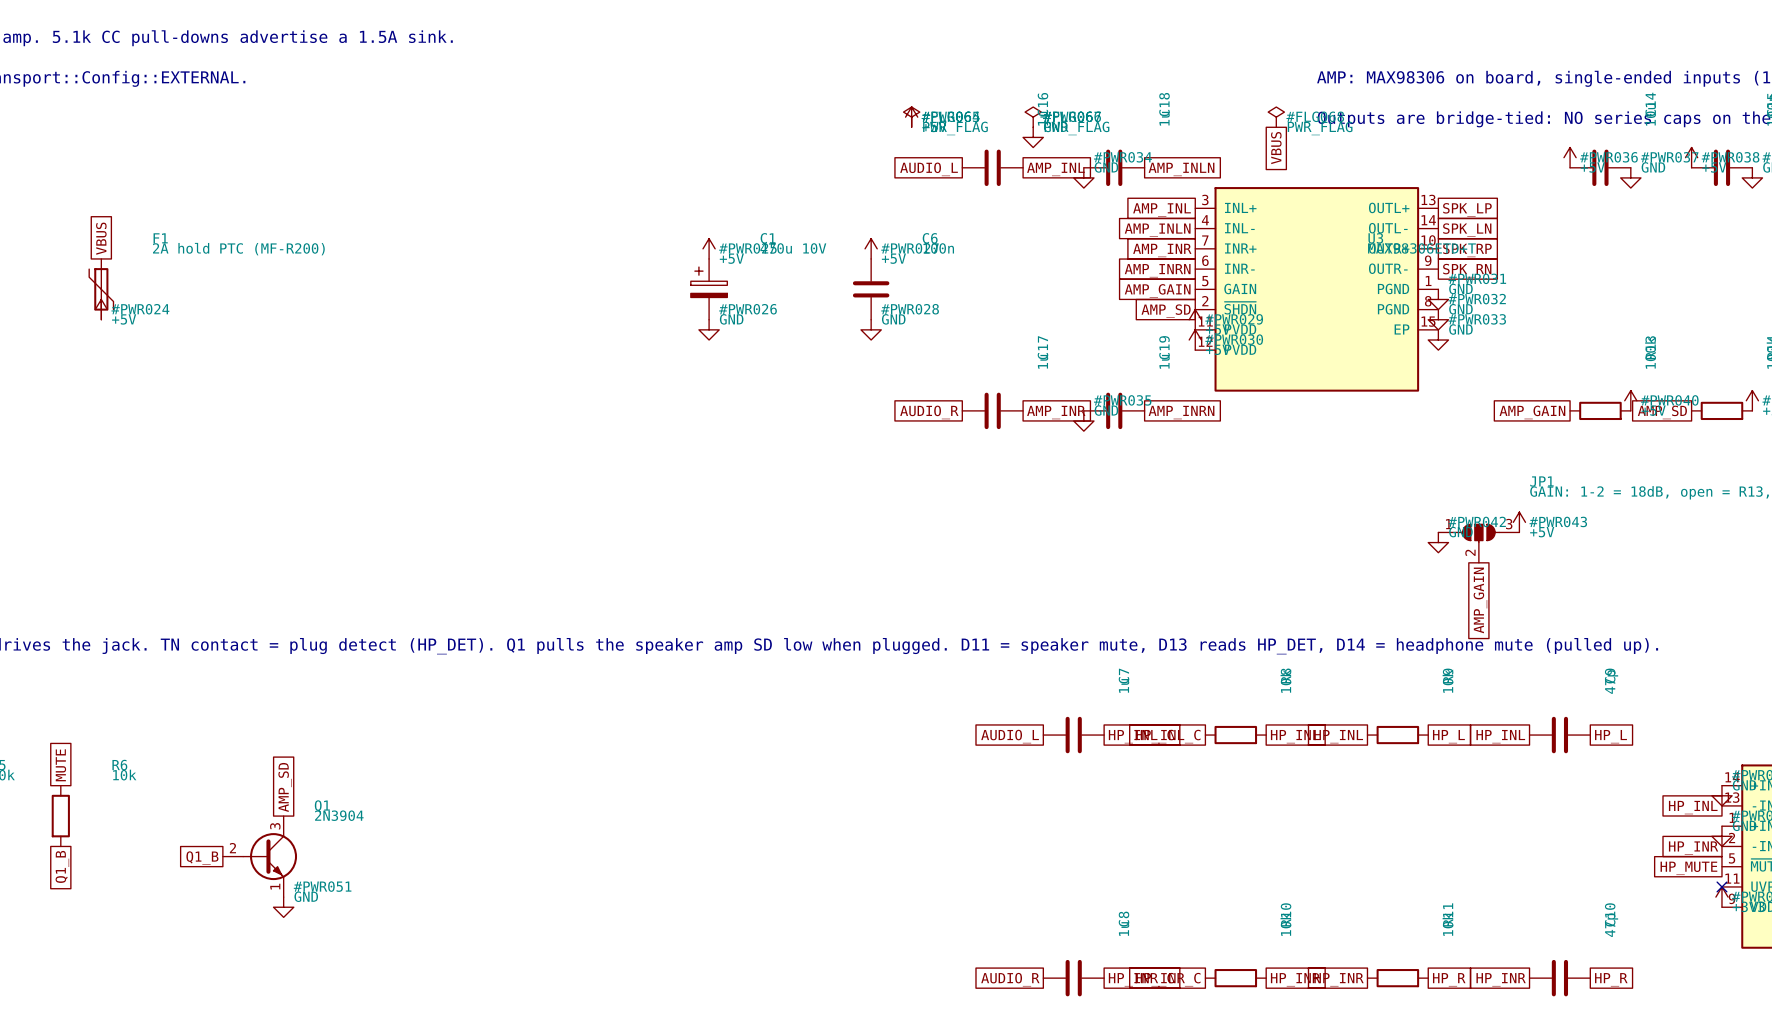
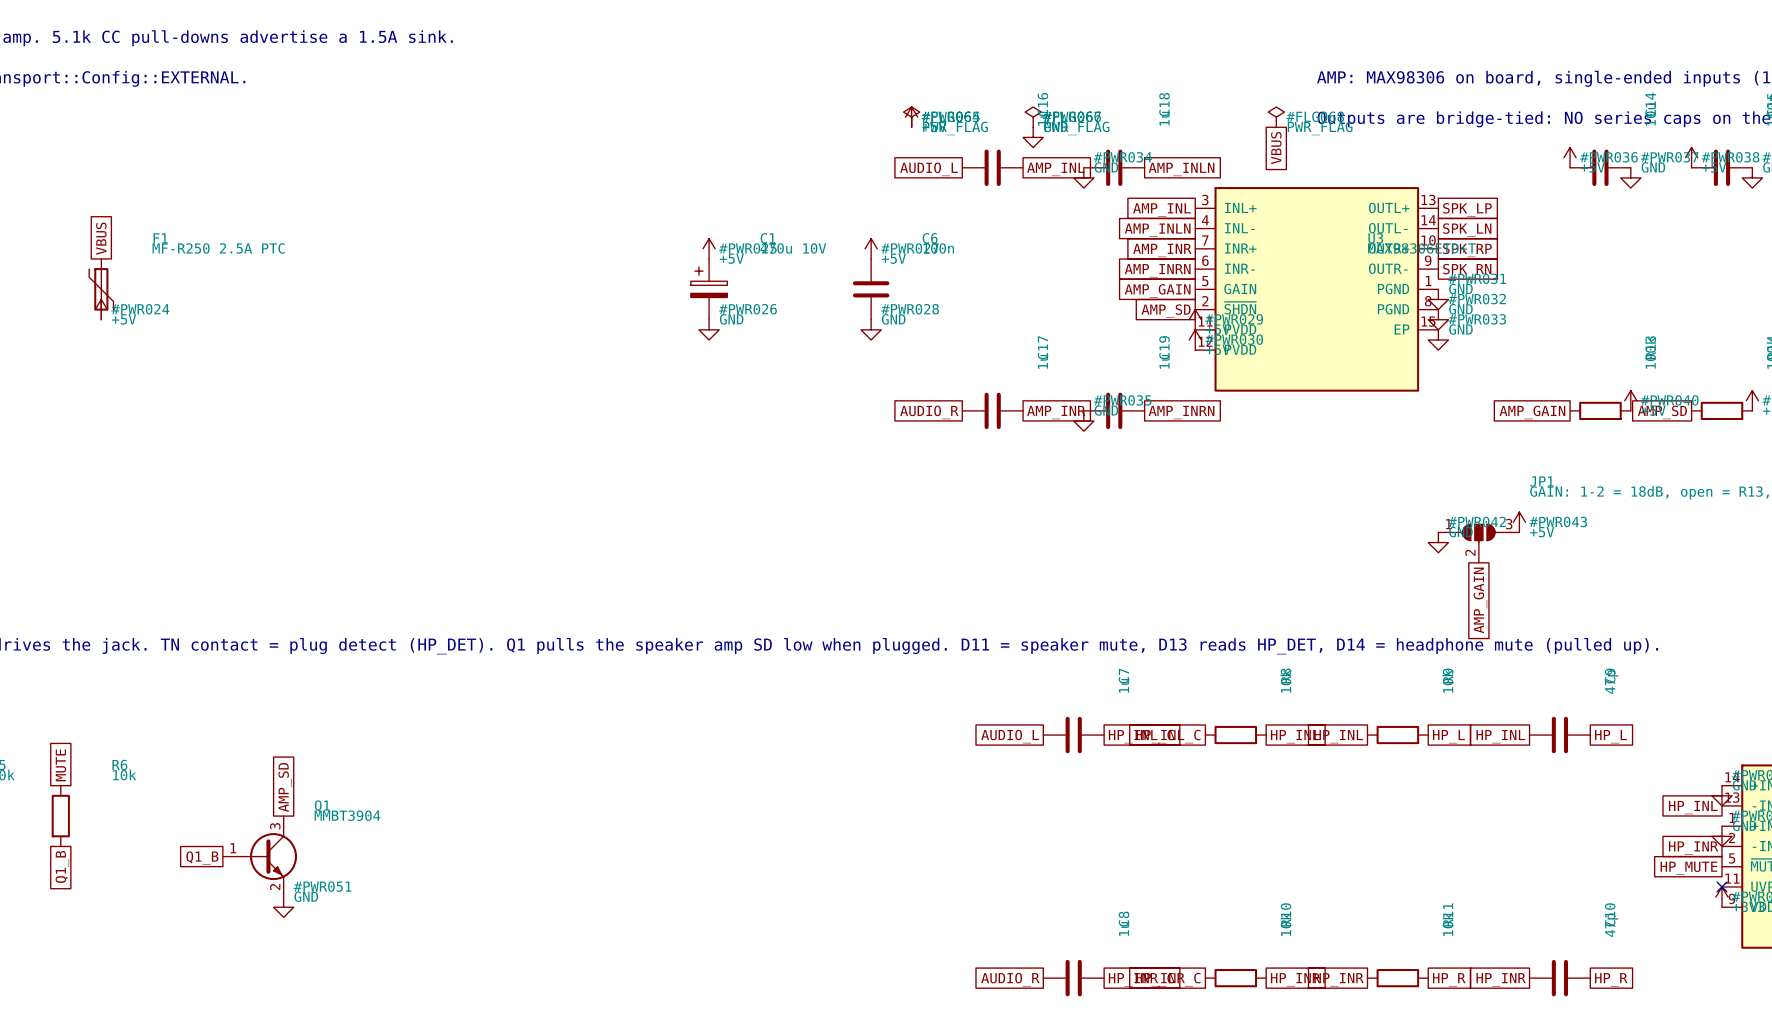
F1 value: 2A hold PTC (MF-R200) (238, 249) -> MF-R250 2.5A PTC (218, 248)
Q1 value: 2N3904 (339, 815) -> MMBT3904 (347, 815)
Q1 pin number: 2 (232, 848) -> 1 (233, 848)
Q1 pin number: 1 (275, 886) -> 2 (275, 887)

